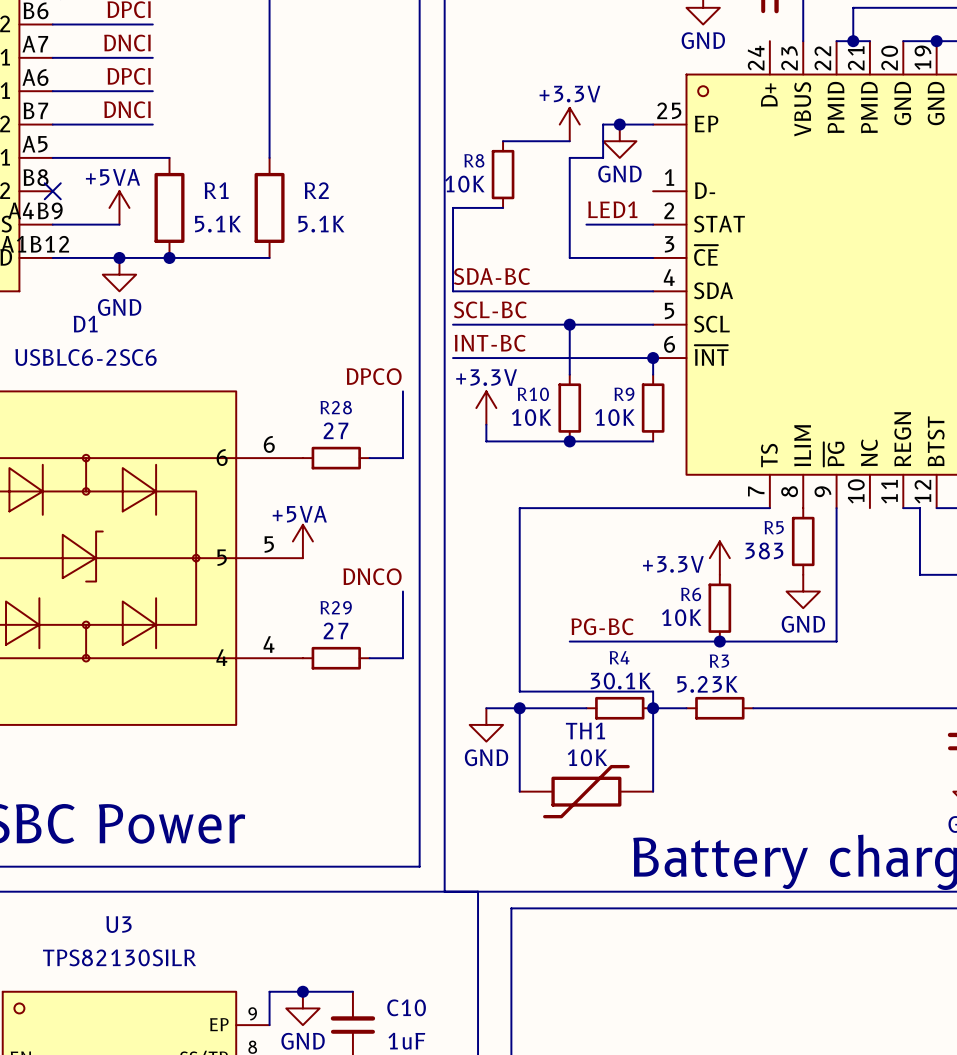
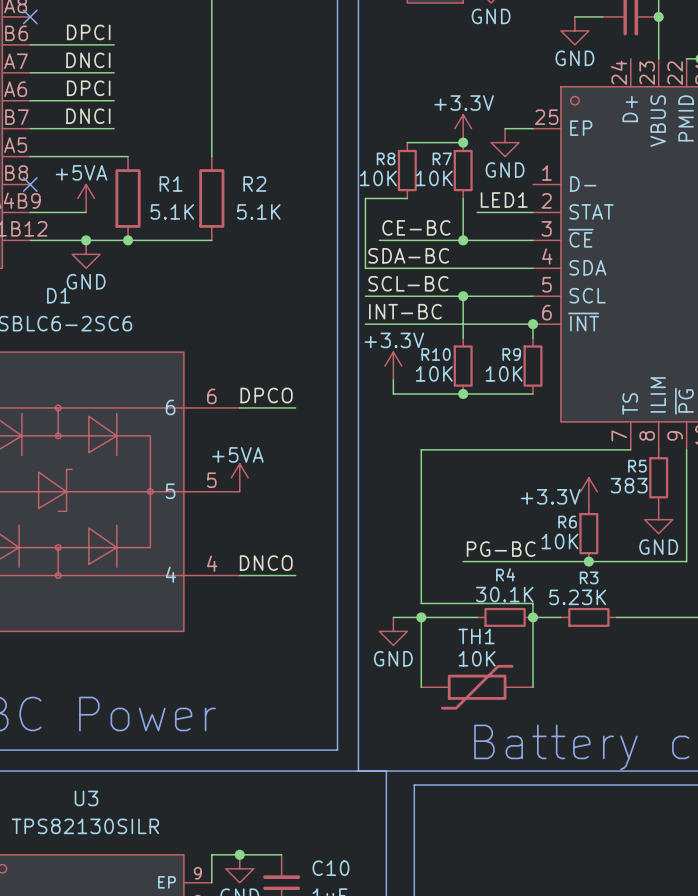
wire: (619, 124) (603, 124) (603, 157) (569, 157) (569, 207) -> none
junction position: (619, 124) -> (463, 142)
R7: none -> 10K (463, 170)
label: none -> CE-BC (416, 227)
wire: none -> (379, 240) (463, 240)
junction: none -> (463, 240)
label position: DPCO (374, 376) -> DPCO (266, 395)
wire: (402, 391) (402, 458) (369, 458) -> (239, 407) (295, 407)
R28: 27 (336, 458) -> none
label position: DNCO (372, 576) -> DNCO (266, 563)
wire: (402, 591) (402, 658) (369, 658) -> (239, 575) (295, 575)
R29: 27 (336, 658) -> none

